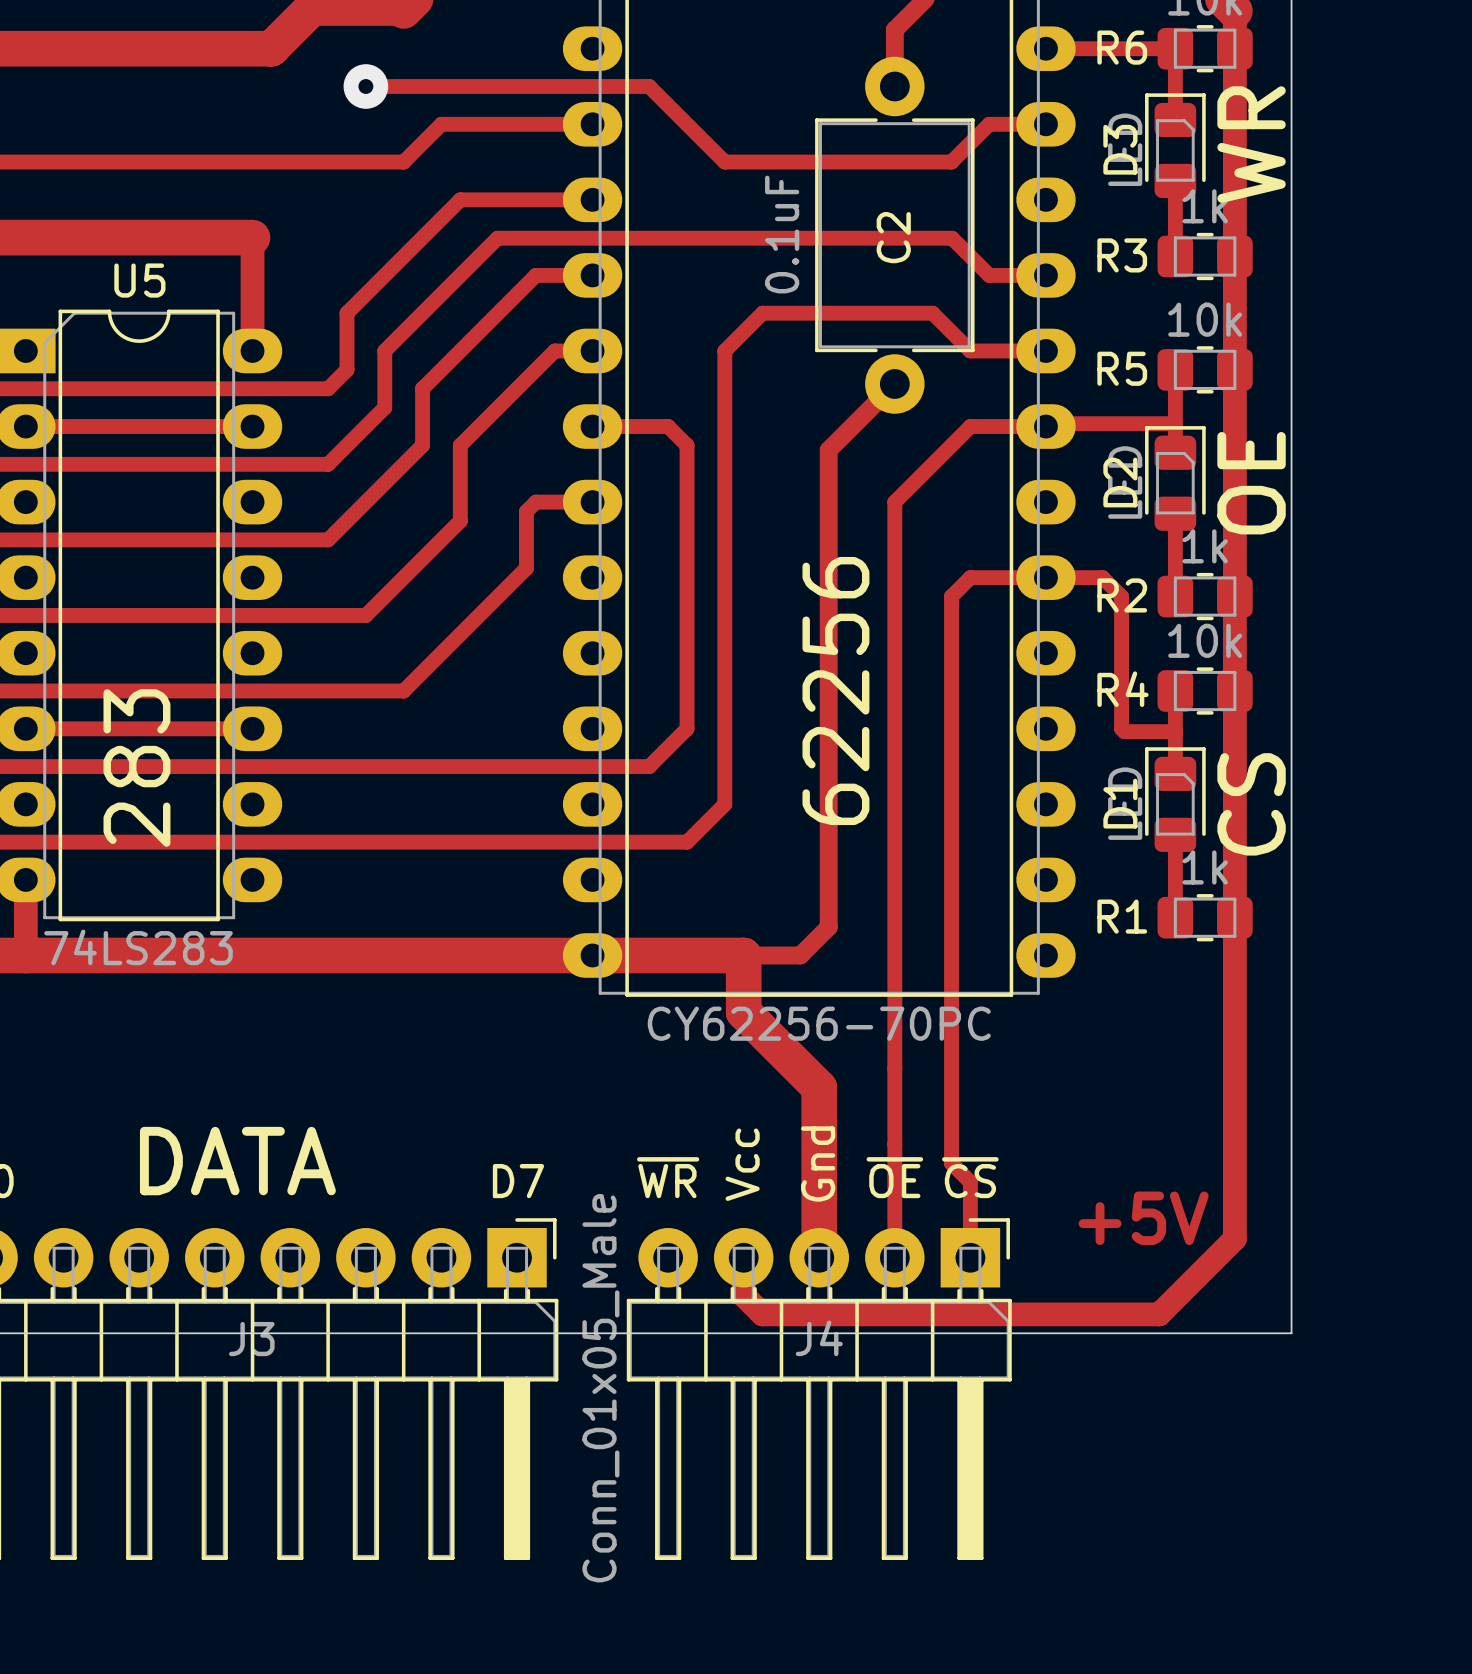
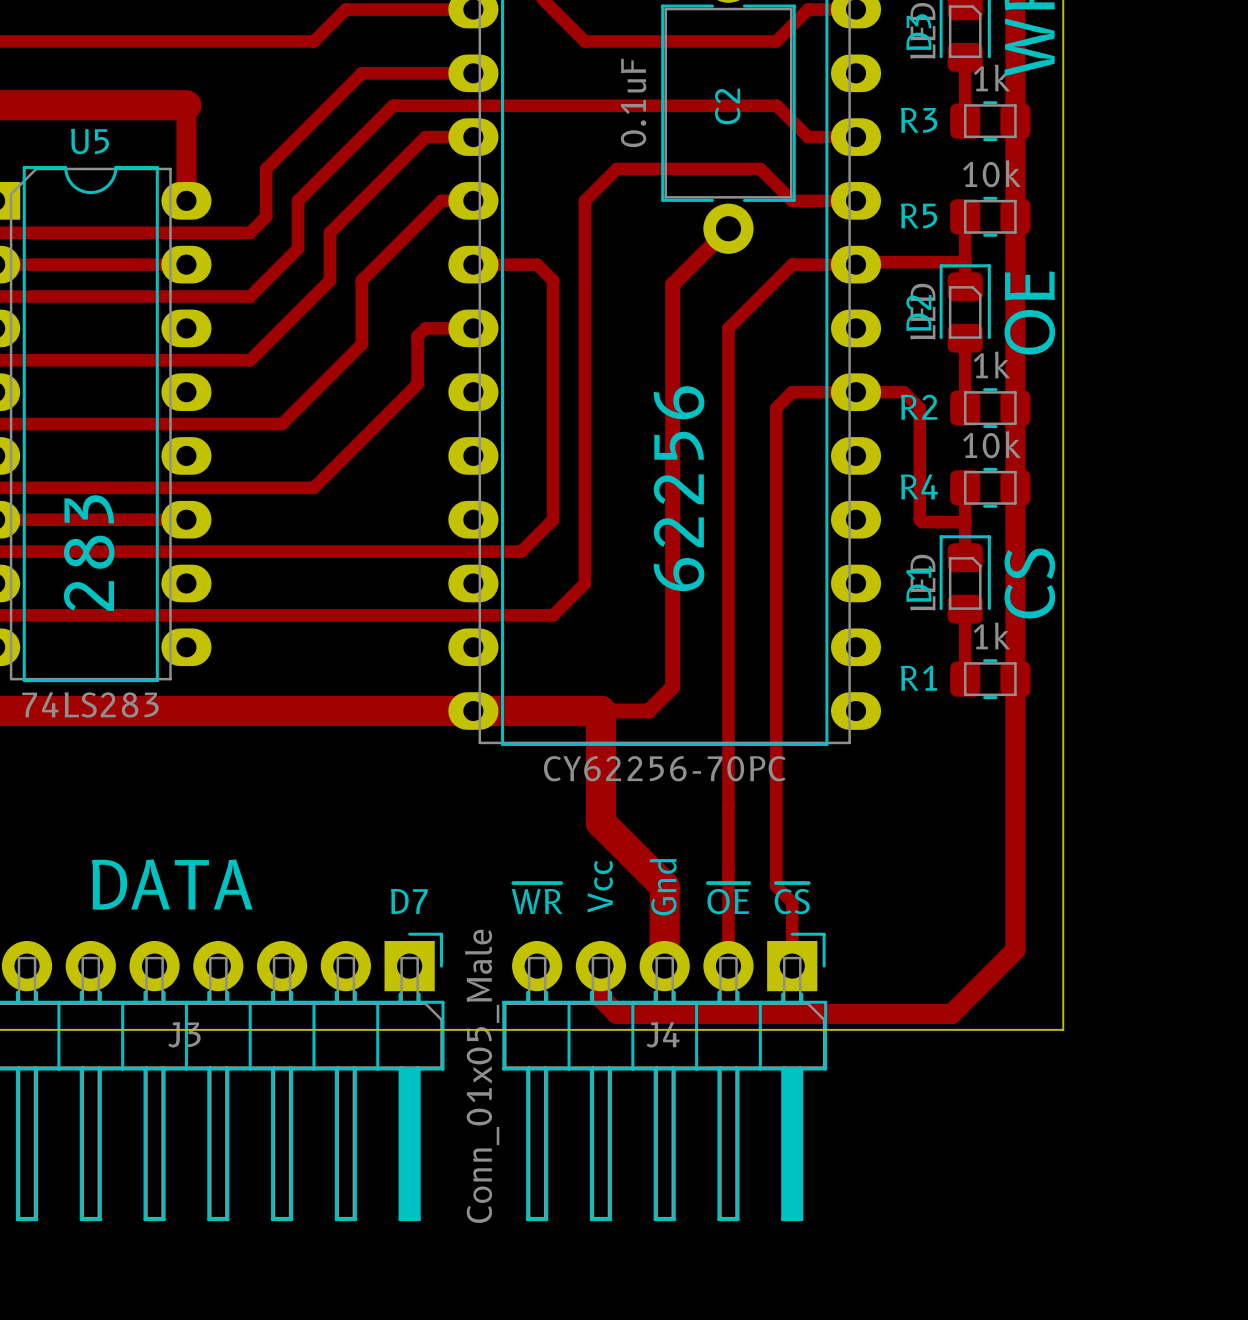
track: (743, 1012) (819, 1087) (819, 1163) -> (600, 758) (600, 822) (664, 886)
text: +5V (1143, 1218) -> none

